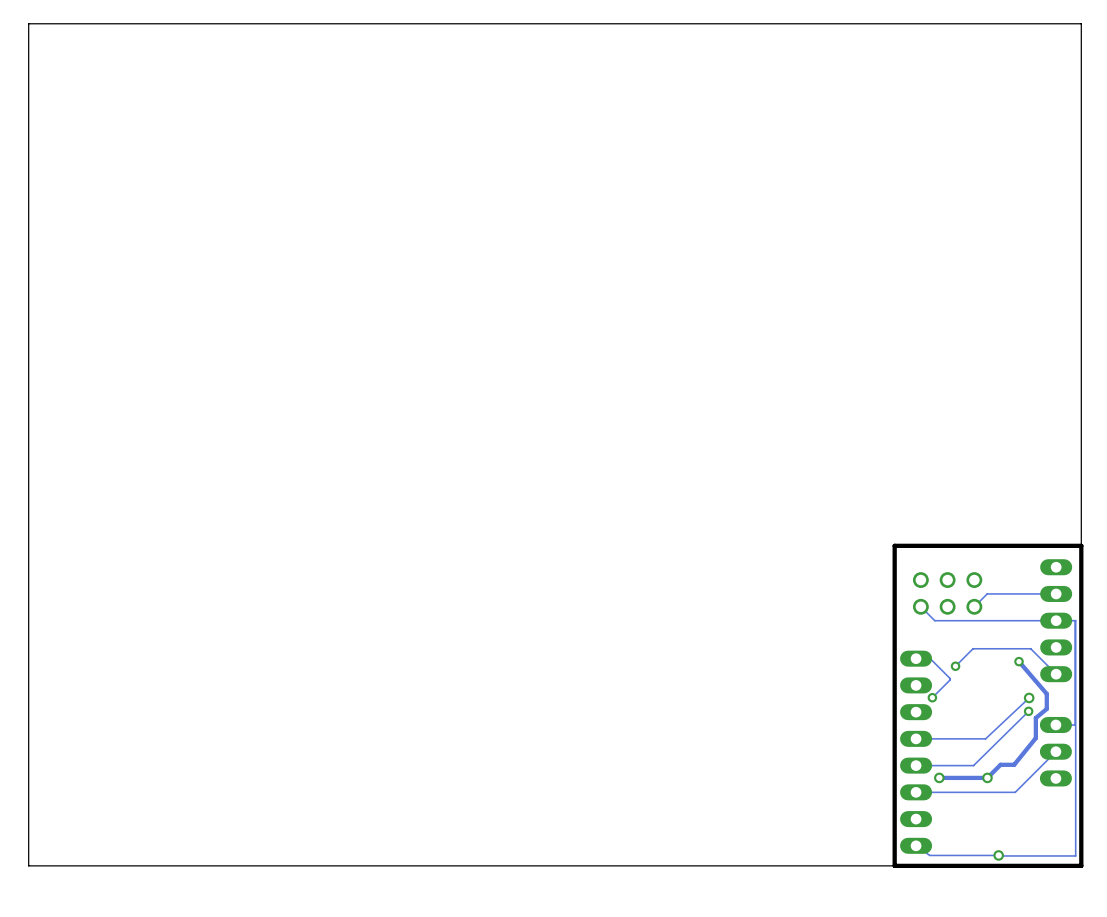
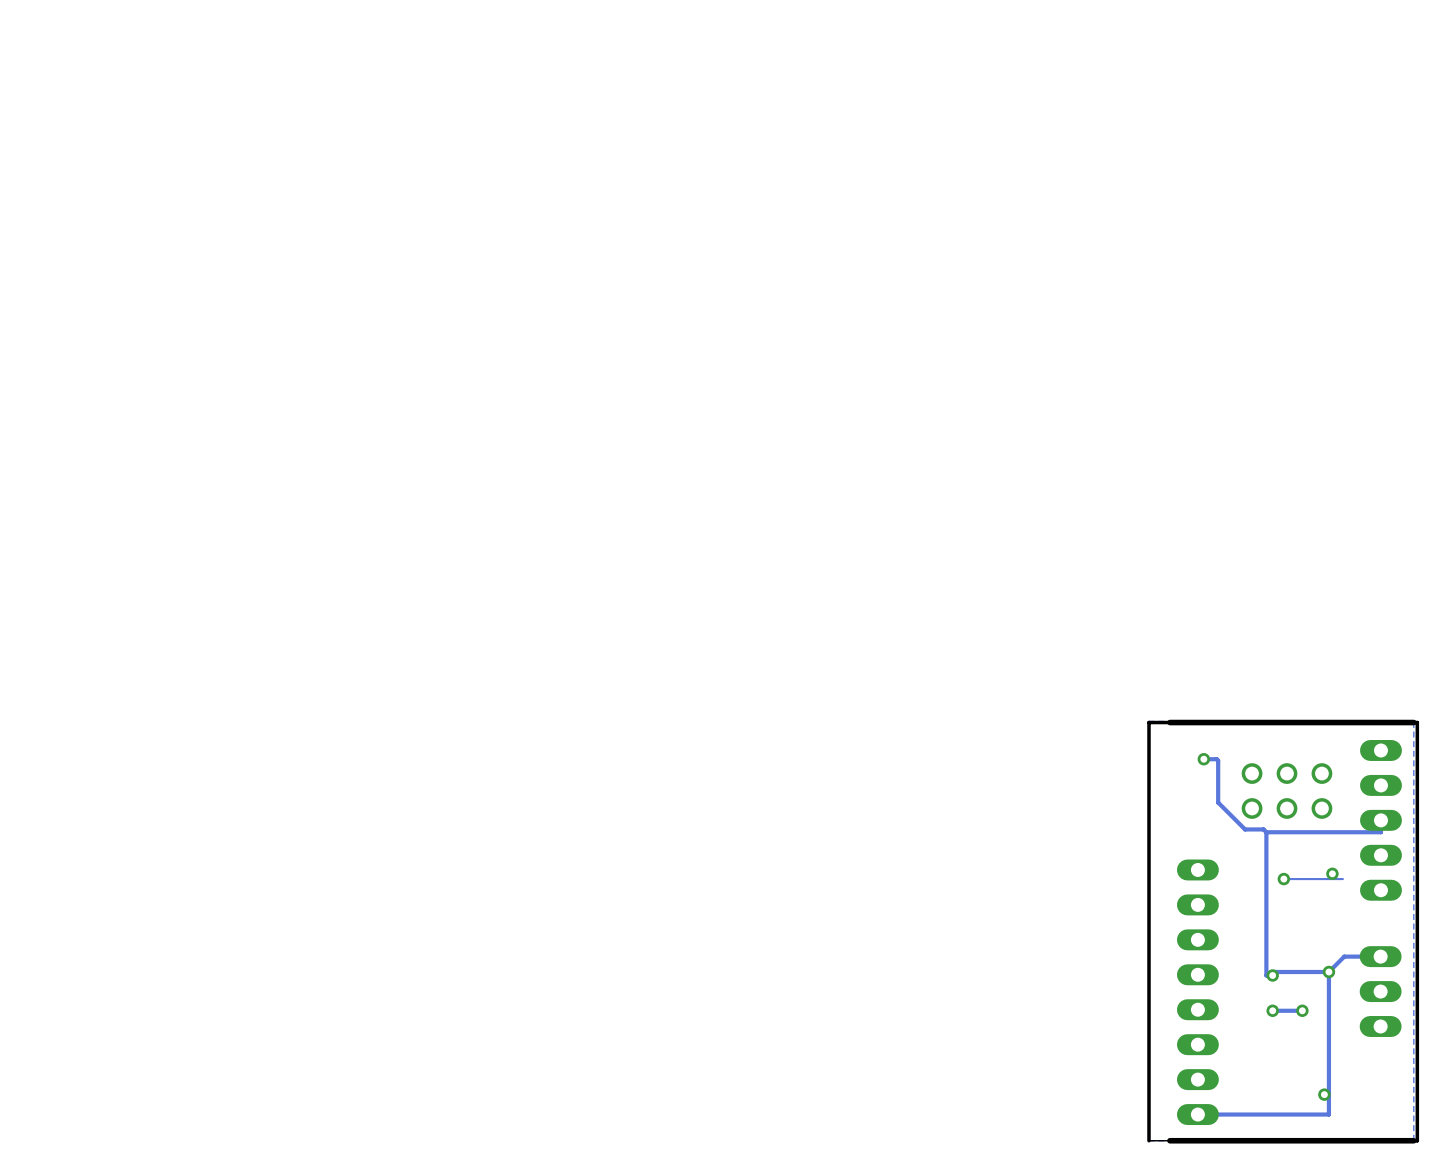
board edge: (894, 545) (894, 865) -> (1169, 722) (1148, 722) (1148, 1140)
track: none -> (1203, 759) (1218, 760) (1218, 802) (1245, 829) (1263, 829) (1266, 832)
via: none -> (1203, 759)
part position: (947, 593) -> (1287, 791)
track: (1056, 593) (987, 593) (974, 606) -> none
track: (920, 606) (934, 620) (1075, 620) (1075, 855) (929, 855) (916, 845) -> (1328, 971) (1328, 1114) (1197, 1114)
track: none -> (1380, 820) (1380, 832) (1266, 832)
track: (1075, 620) (1075, 724) (1055, 724) -> (1328, 971) (1344, 956) (1380, 956)
track: none -> (1266, 832) (1266, 975) (1272, 975) (1272, 971) (1328, 971)
track: (916, 658) (930, 658) (950, 678) (932, 697) -> none
track: (1019, 661) (1046, 693) (1046, 708) (1035, 718) (1035, 738) (1014, 764) (1000, 764) (987, 777) (939, 777) -> none
track: none -> (1342, 879) (1283, 879)
track: (955, 666) (973, 648) (1030, 648) (1056, 674) -> none
via position: (955, 666) -> (1283, 879)
via: (932, 697) -> none
track: (1029, 697) (985, 738) (916, 738) -> none
via: (1029, 697) -> none
track: (1028, 711) (973, 765) (916, 765) -> none
via position: (1028, 711) -> (1328, 971)
via: none -> (1272, 975)
track: (1055, 751) (1015, 792) (916, 792) -> none
via: none -> (1272, 1010)
track: none -> (1302, 1010) (1272, 1010)
via: none -> (1302, 1010)
via: (939, 777) -> none
via: (987, 777) -> none
via: none -> (1324, 1094)
via: (998, 855) -> none
board edge: (1081, 865) (1081, 23) (28, 23) (28, 865) (878, 865) -> (1413, 1140) (1417, 1140) (1417, 722) (1413, 722)

